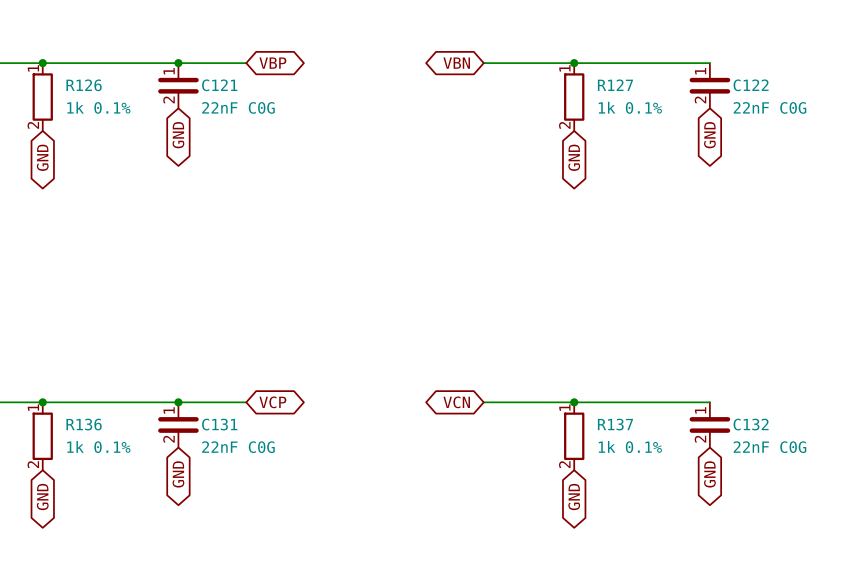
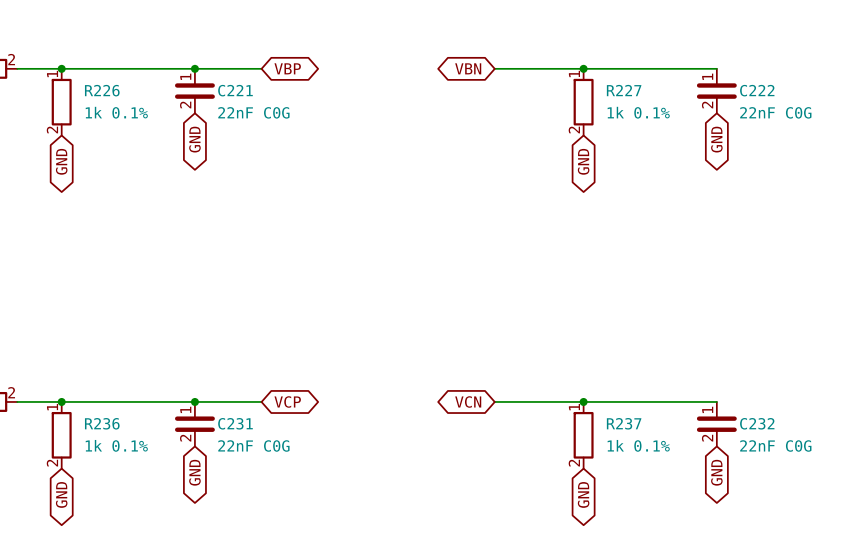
R126 name: R126 (84, 85) -> R226 (102, 90)
C121 name: C121 (219, 85) -> C221 (235, 90)
R127 name: R127 (615, 85) -> R227 (624, 90)
C122 name: C122 (751, 85) -> C222 (757, 90)
R136 name: R136 (84, 424) -> R236 (102, 423)
C131 name: C131 (219, 424) -> C231 (235, 423)
R137 name: R137 (615, 424) -> R237 (624, 423)
C132 name: C132 (751, 424) -> C232 (757, 423)

